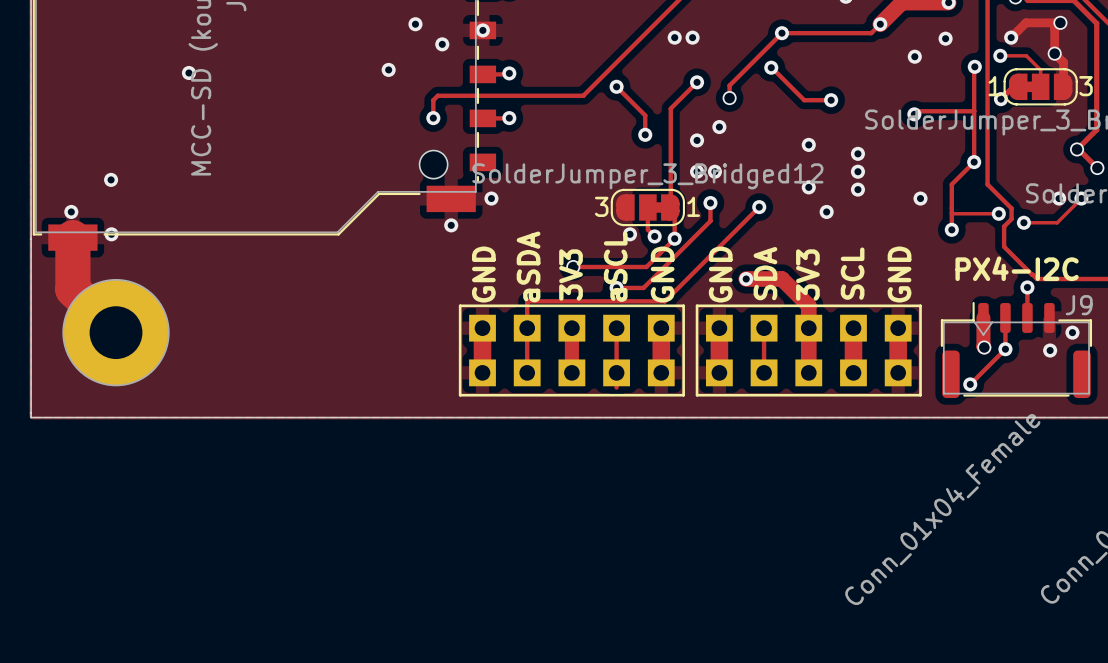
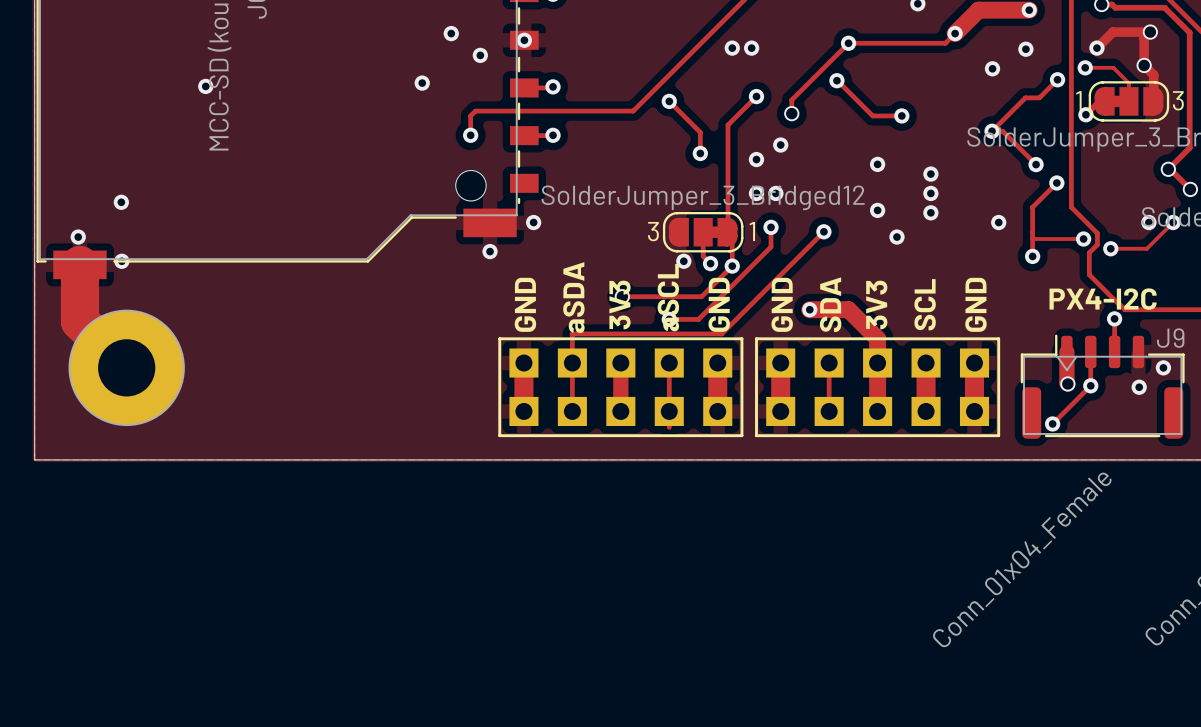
track: (974, 67) (974, 162) -> none
track: (917, 111) (974, 111) -> (995, 127) (1025, 97) (1039, 97) (1056, 80)
track: none -> (992, 131) (1002, 131) (1036, 164)
via: none -> (1036, 164)

